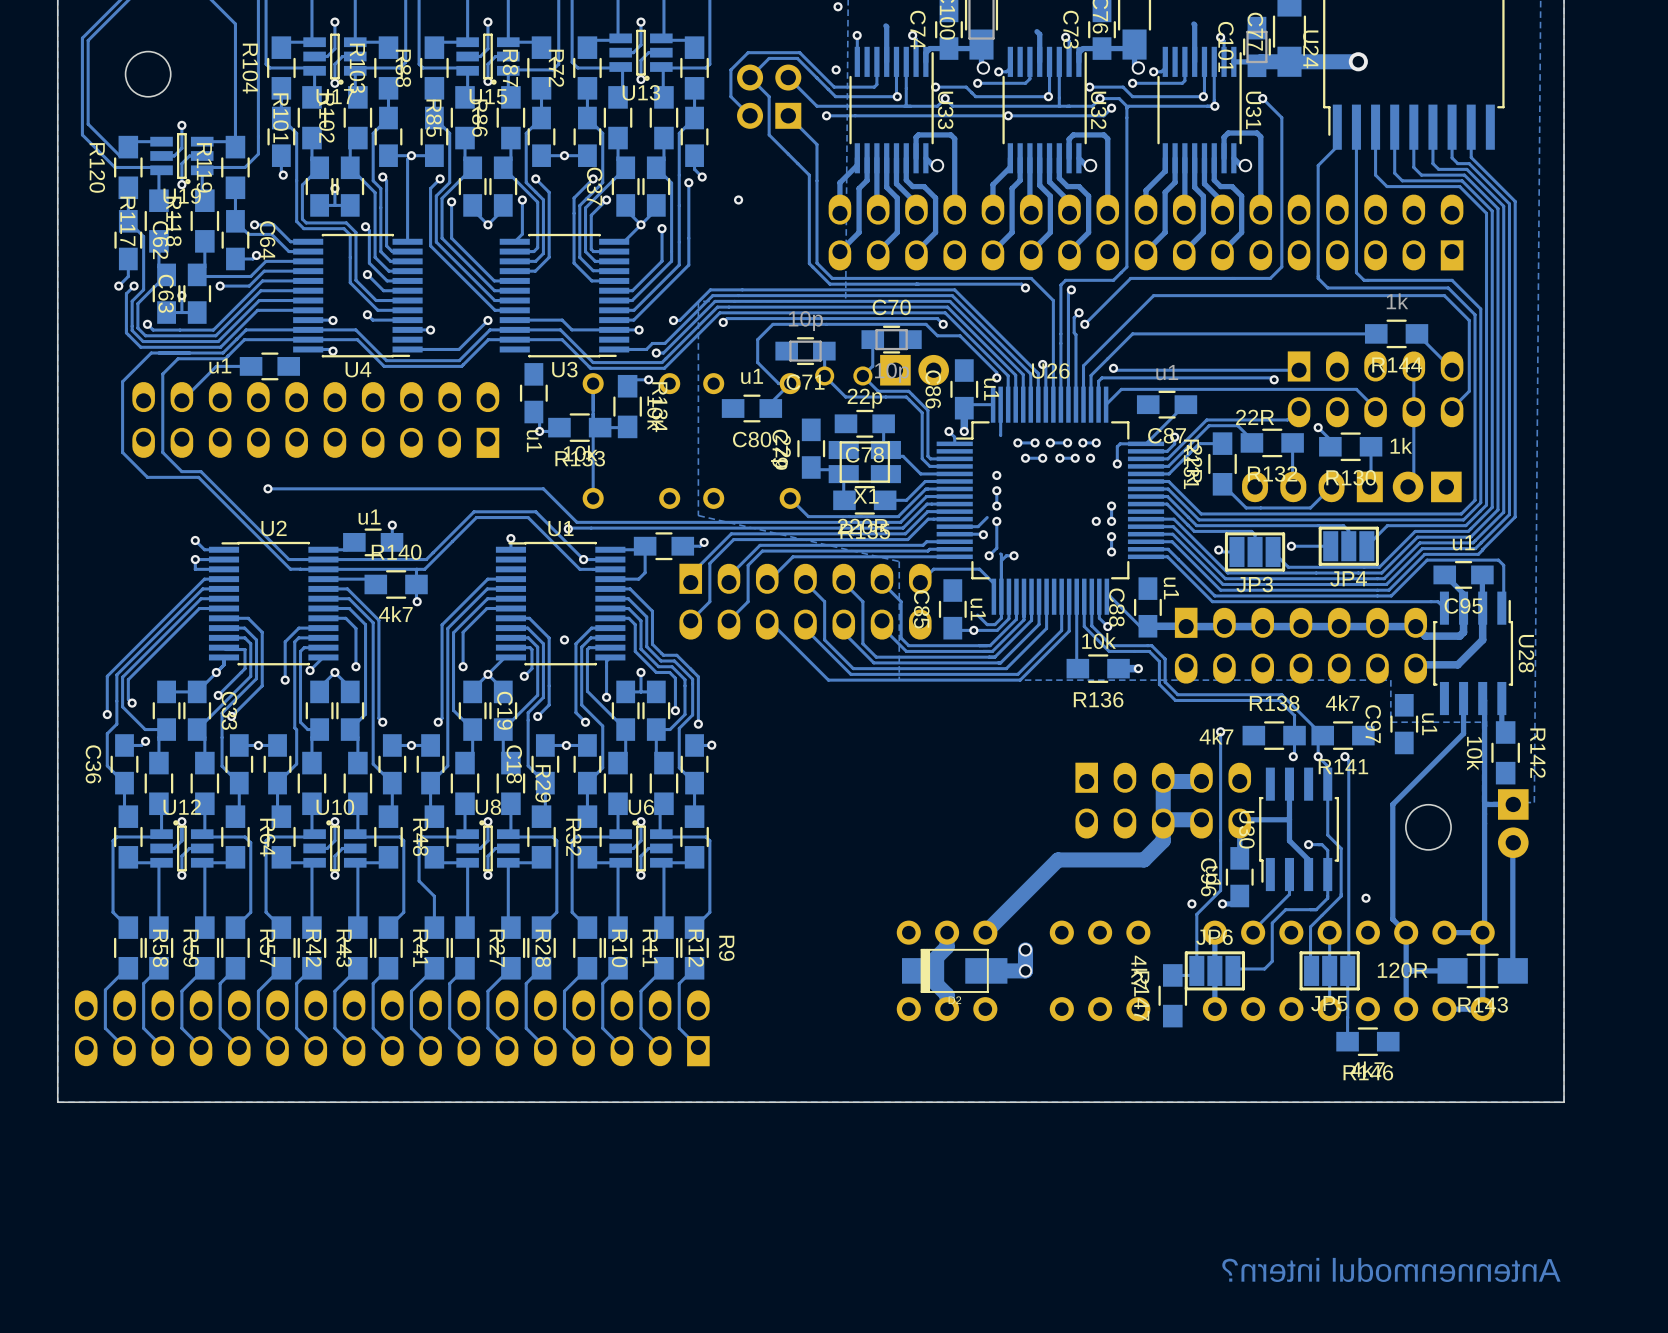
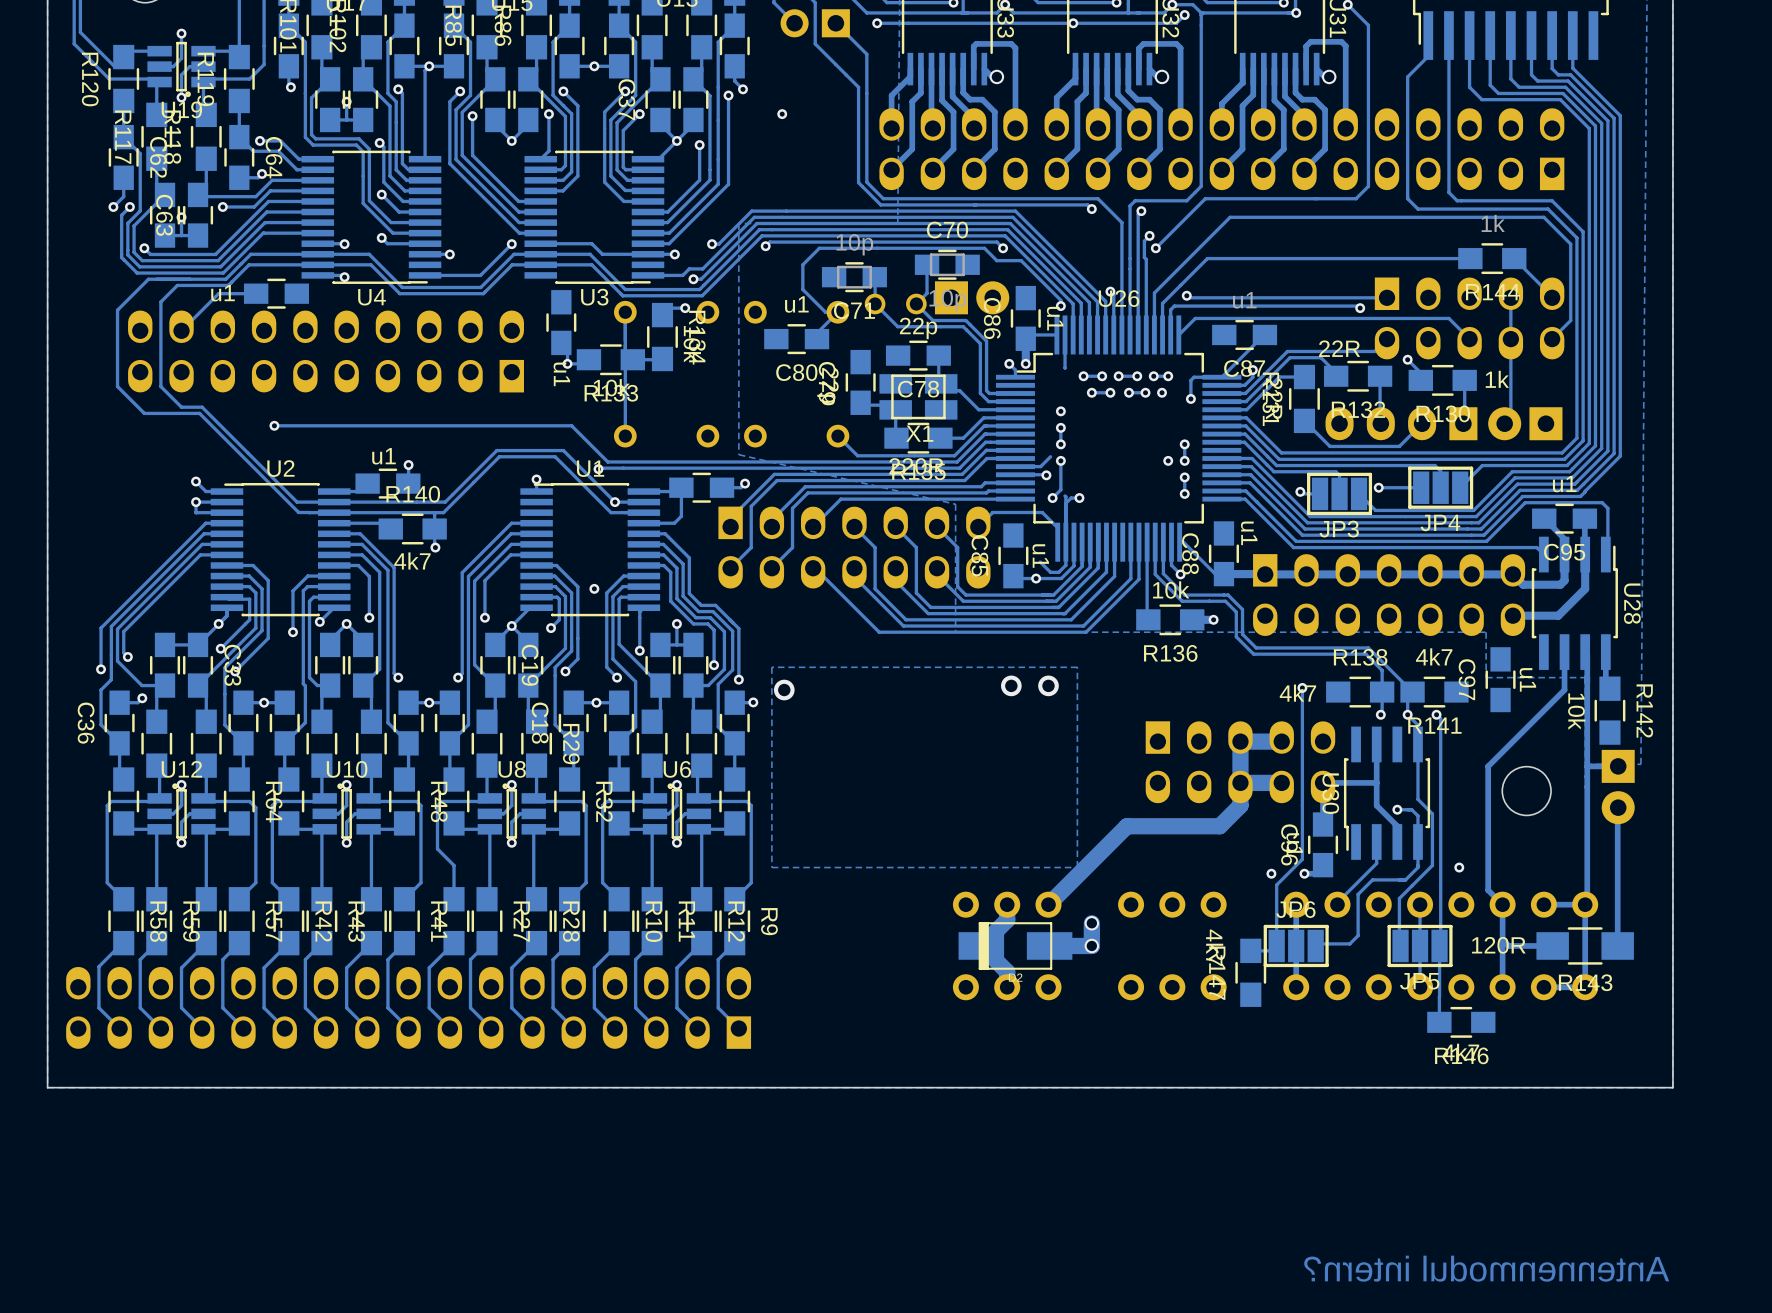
zone outline: none -> (1077, 667) (1077, 867) (771, 867) (771, 667) (1077, 667)
via: none -> (1011, 685)
via: none -> (1048, 685)
via: none -> (784, 690)

